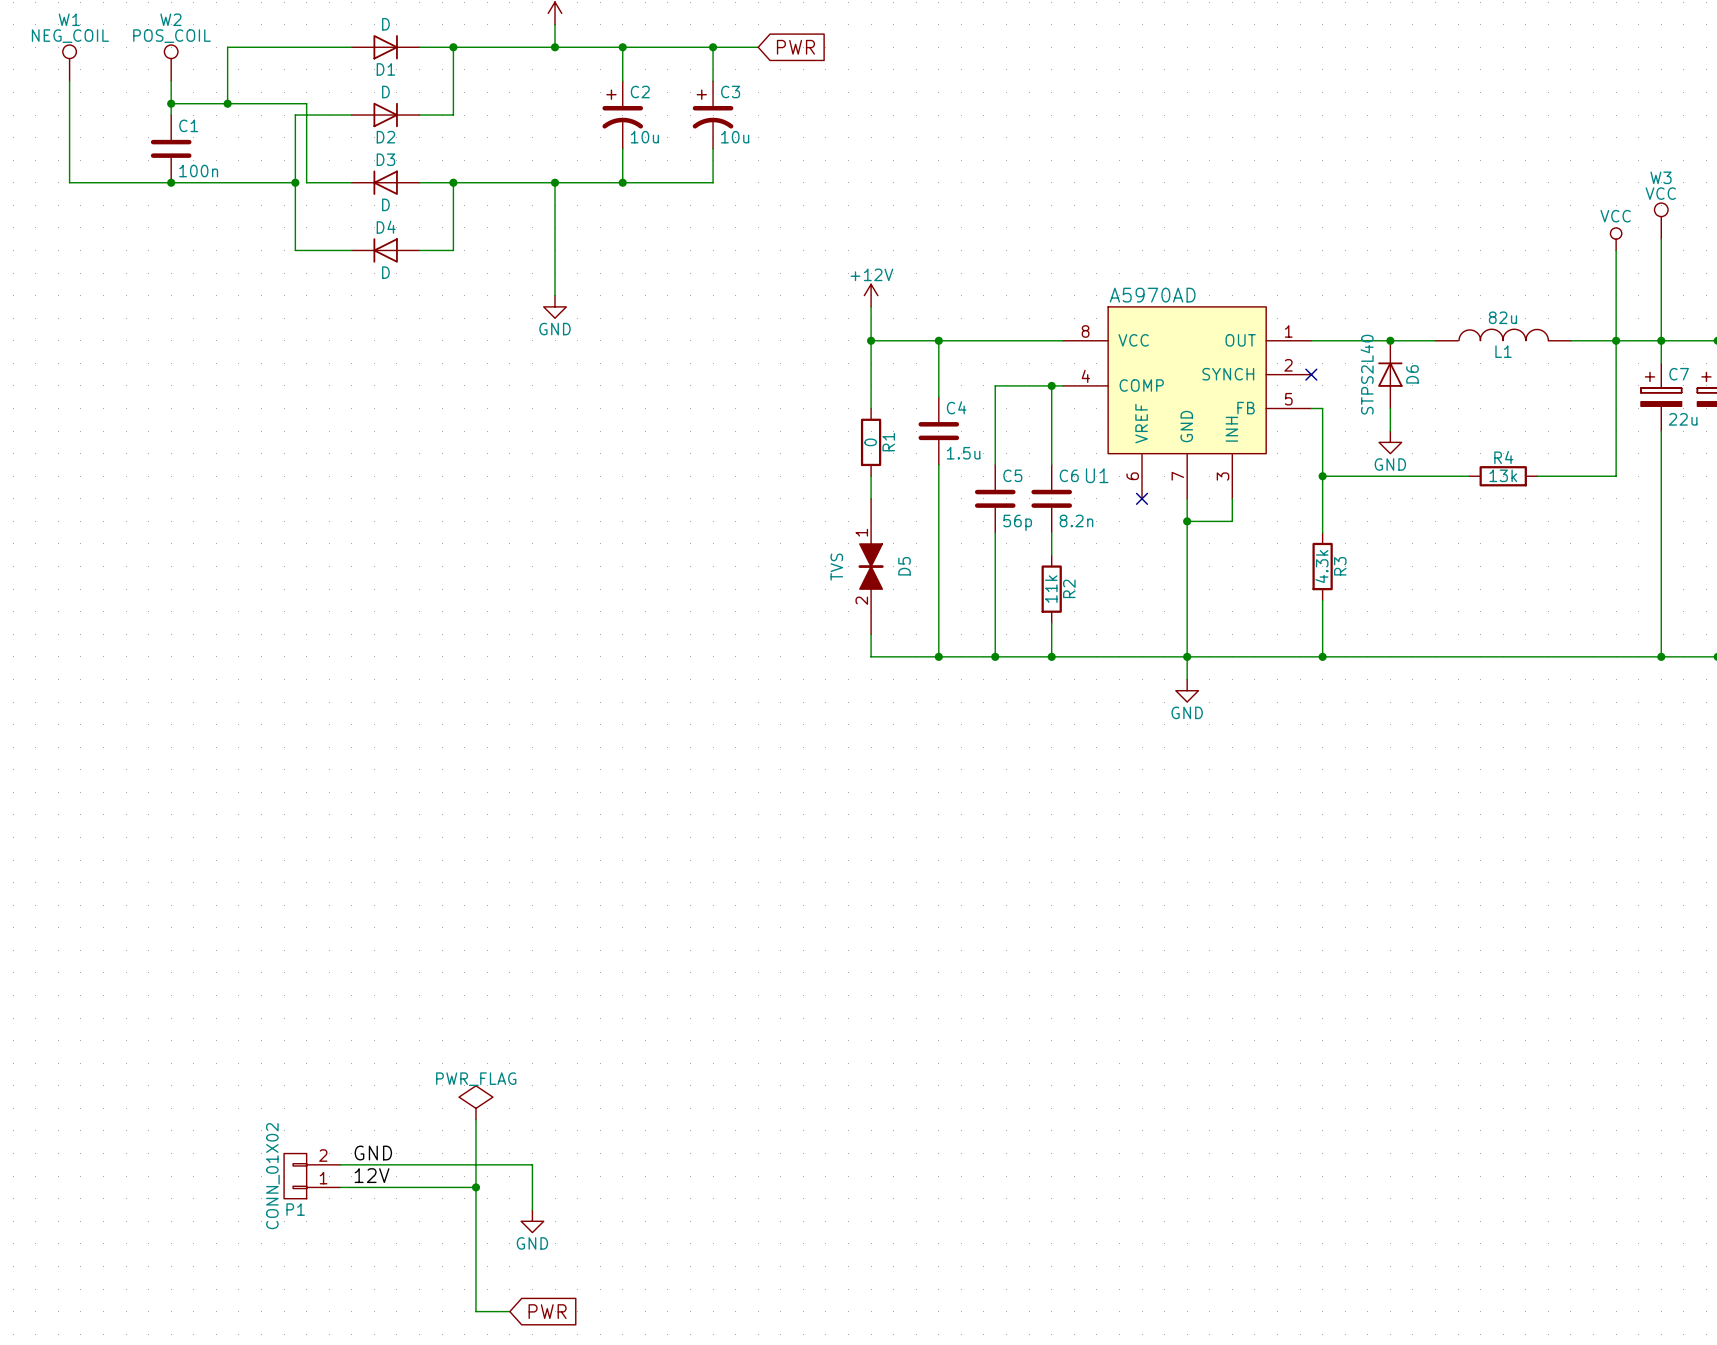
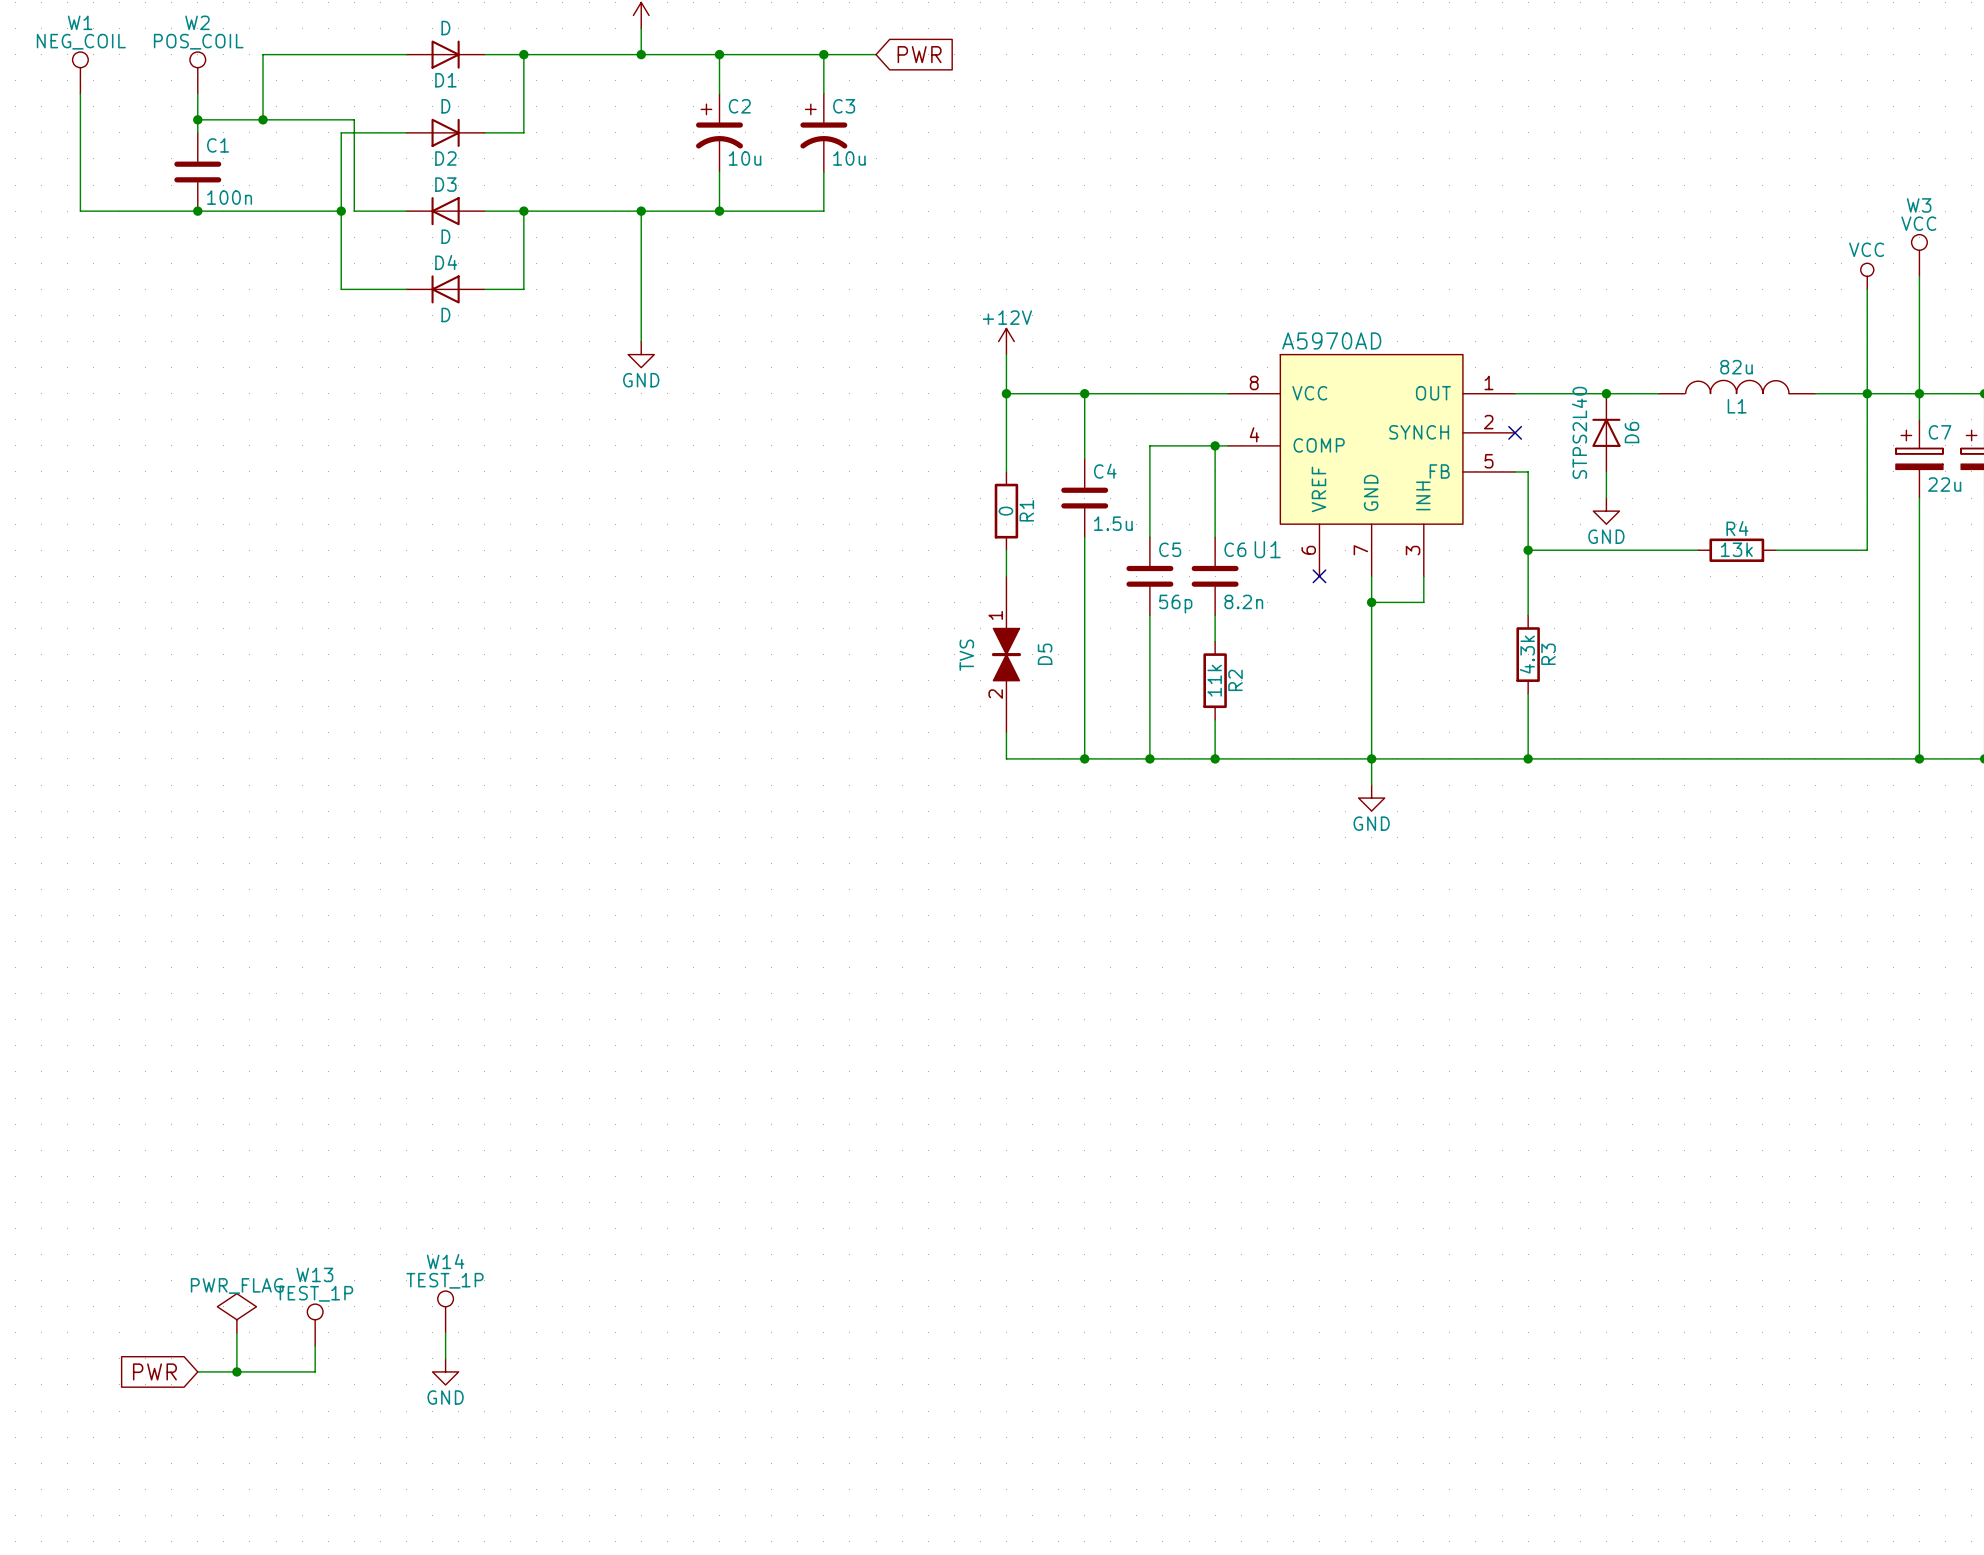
power symbol: PWR_FLAG (475, 1102) -> none
wire: (475, 1119) (475, 1311) (509, 1311) -> none
W14: none -> TEST_1P (445, 1311)
power symbol: none -> PWR_FLAG (236, 1313)
W13: none -> TEST_1P (315, 1324)
wire: none -> (236, 1332) (236, 1371)
label: GND (373, 1153) -> none
wire: none -> (445, 1332) (445, 1358)
wire: none -> (315, 1345) (315, 1371) (197, 1371)
wire: (340, 1164) (532, 1164) (532, 1210) -> none
label: 12V (372, 1175) -> none
P1: CONN_01X02 (312, 1176) -> none
global label: none -> PWR (154, 1371)
junction: none -> (236, 1371)
wire: (340, 1187) (475, 1187) -> none
junction: (475, 1187) -> none
power symbol position: GND (532, 1221) -> GND (445, 1371)
global label: PWR (547, 1311) -> none

